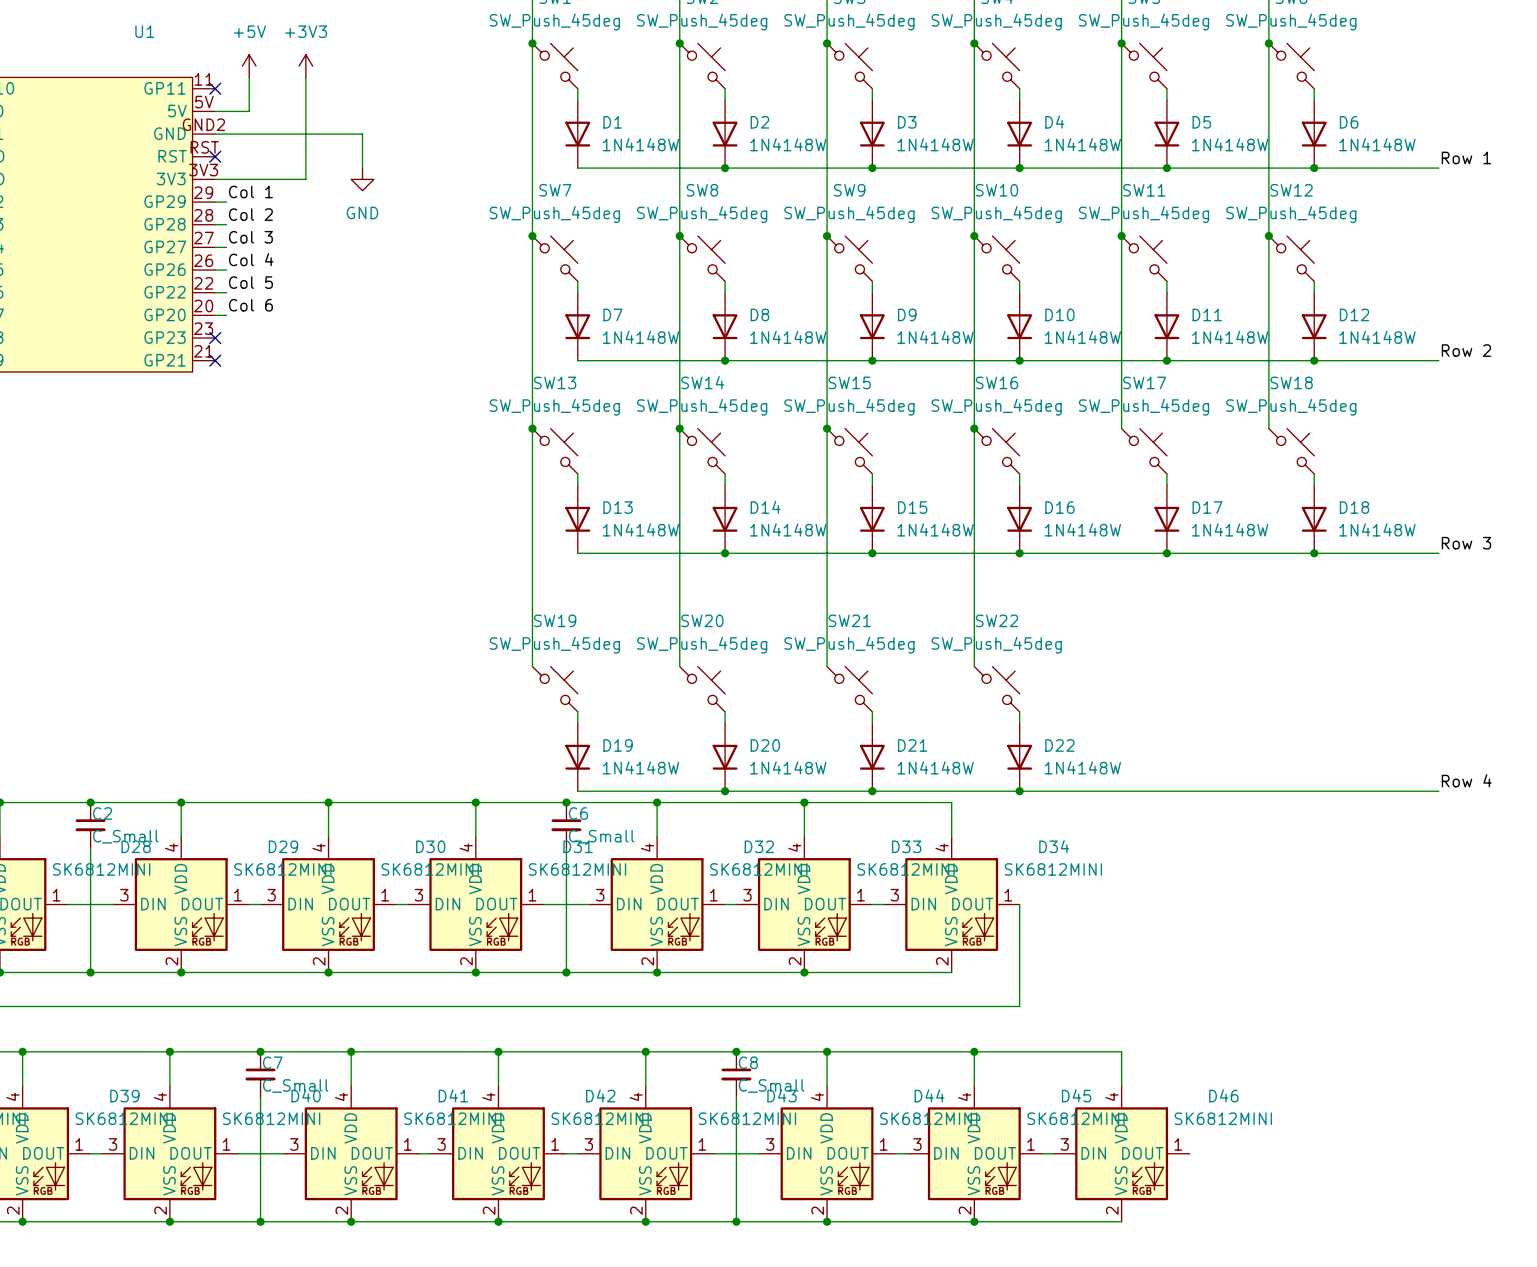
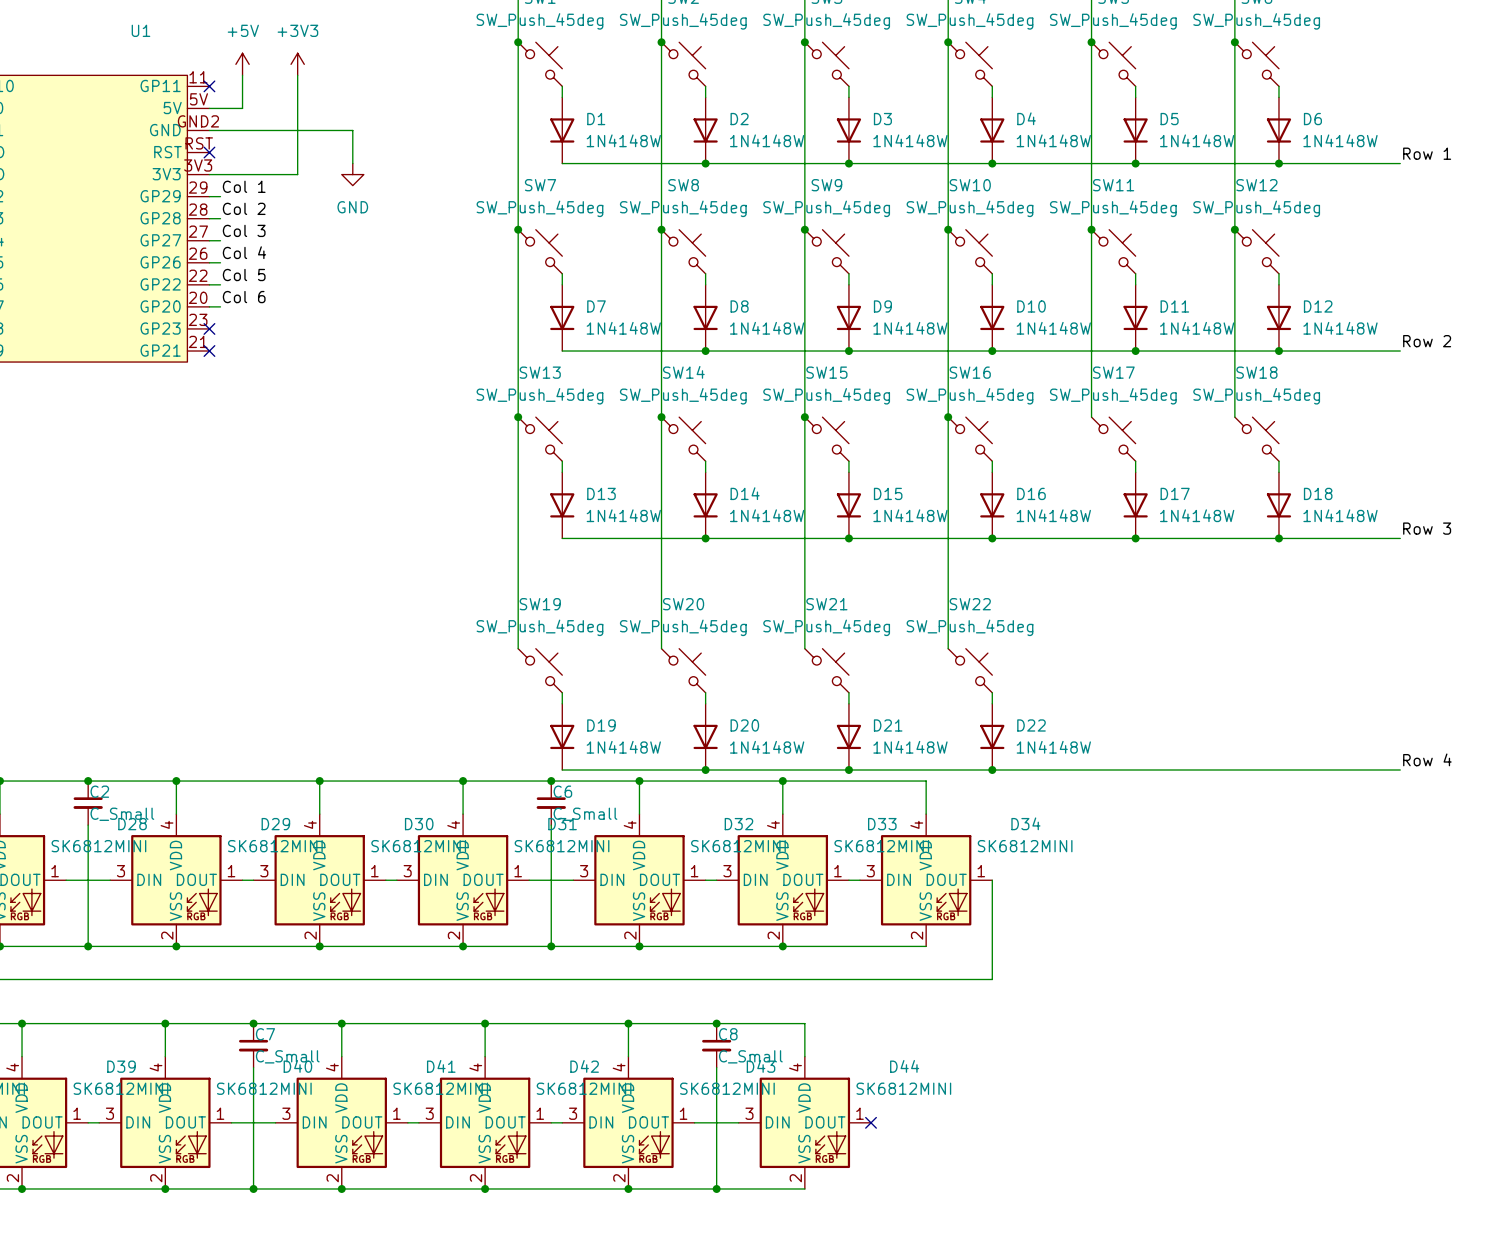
wire: (827, 1051) (1121, 1051) (1121, 1085) -> none
junction: (827, 1051) -> none
wire: (974, 1051) (974, 1085) -> none
junction: (974, 1051) -> none
wire: (895, 1153) (906, 1153) -> none
no-connect mark: none -> (871, 1122)
D45: SK6812MINI (974, 1153) -> none
wire: (1042, 1153) (1053, 1153) -> none
D46: SK6812MINI (1121, 1153) -> none
wire: (827, 1221) (1121, 1221) -> none
junction: (827, 1221) -> none
junction: (974, 1221) -> none

